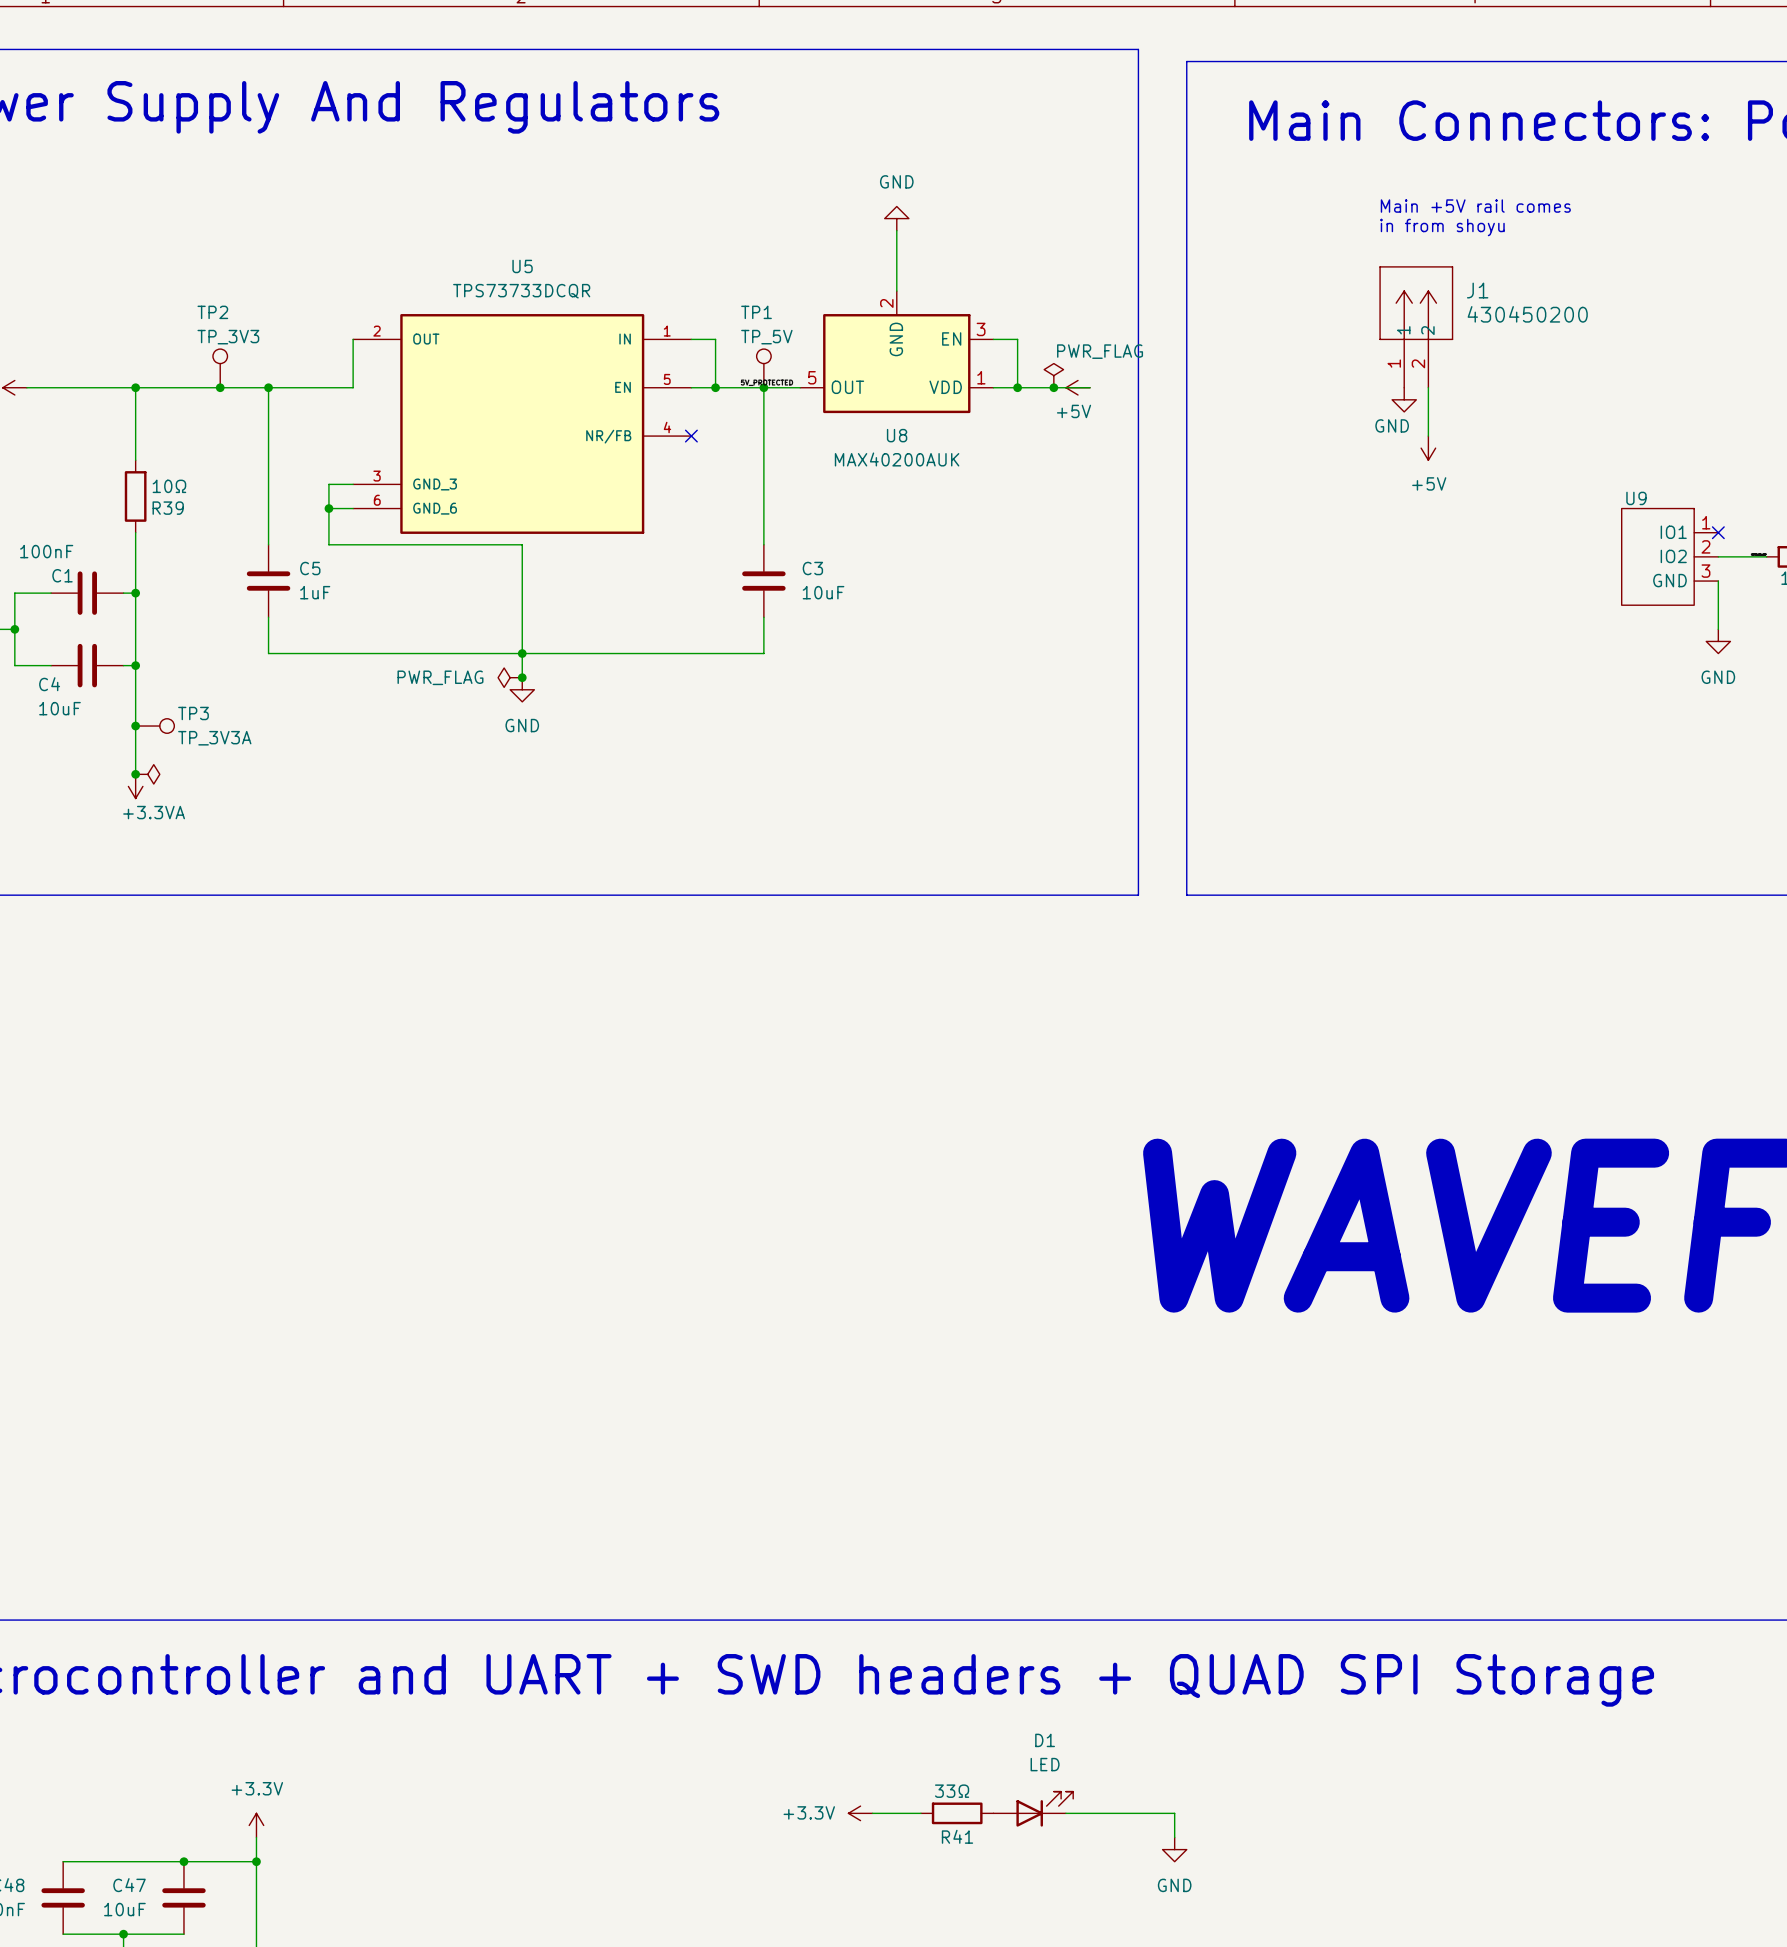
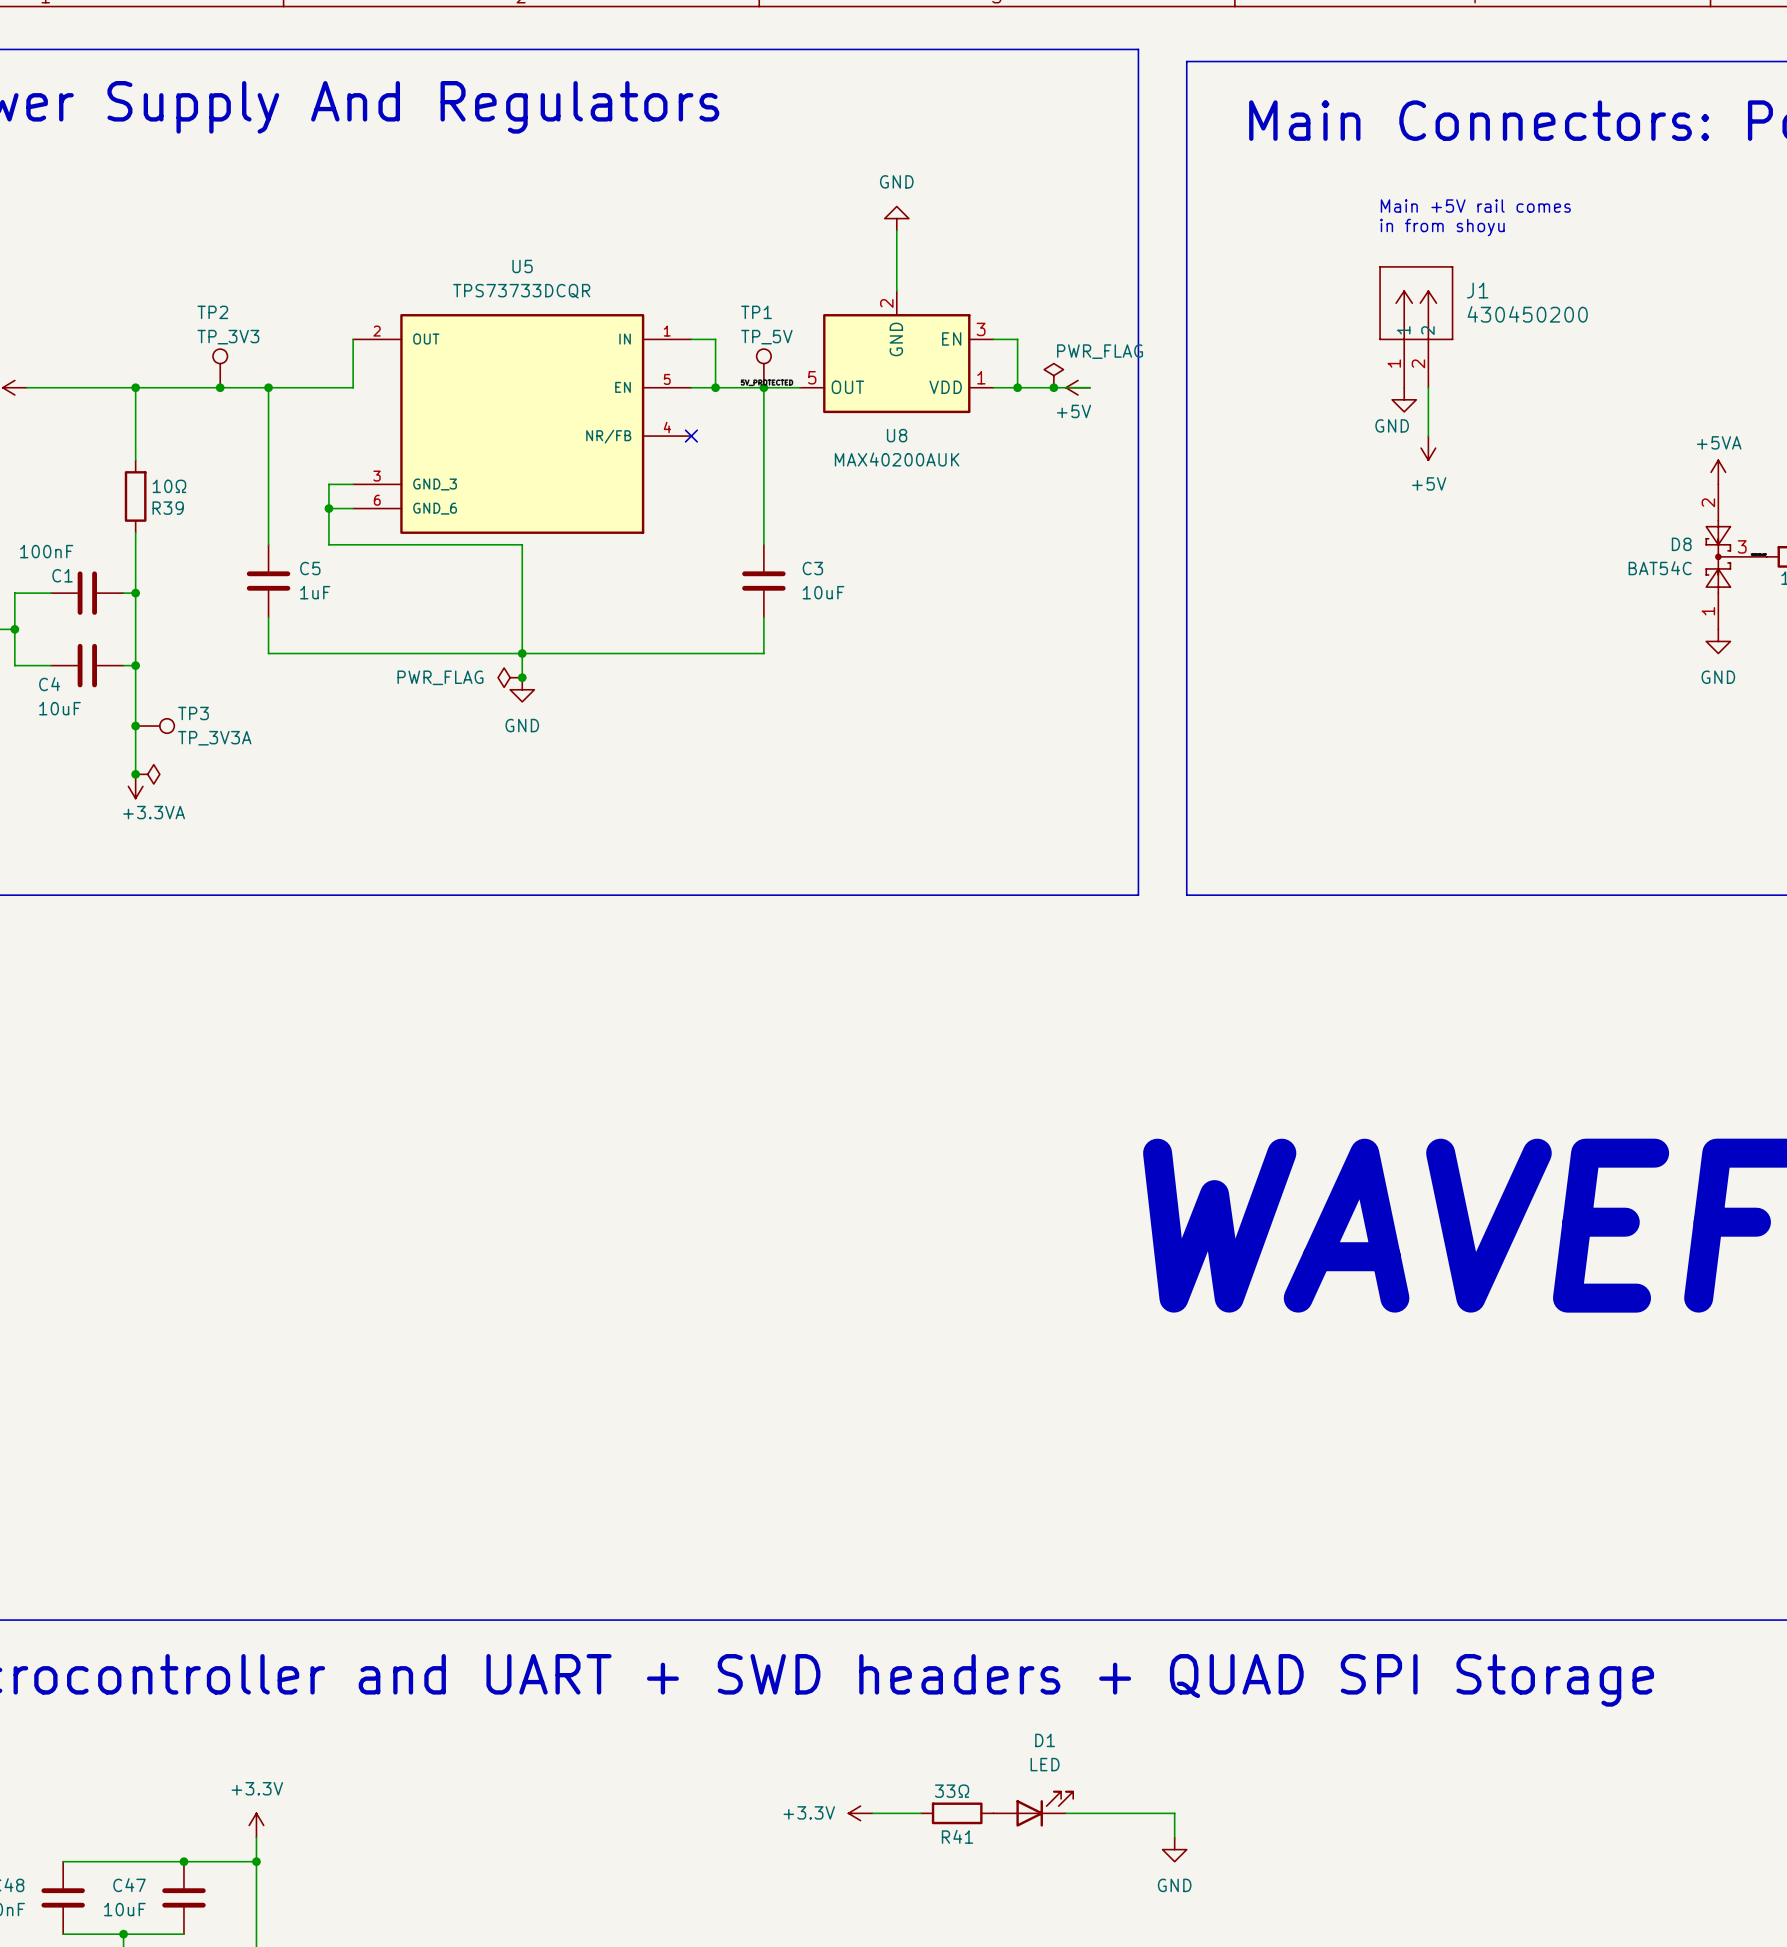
power symbol: none -> +5VA (1718, 472)
no-connect mark: (1718, 532) -> none
U9: (1670, 556) -> none
D8: none -> BAT54C (1736, 556)

